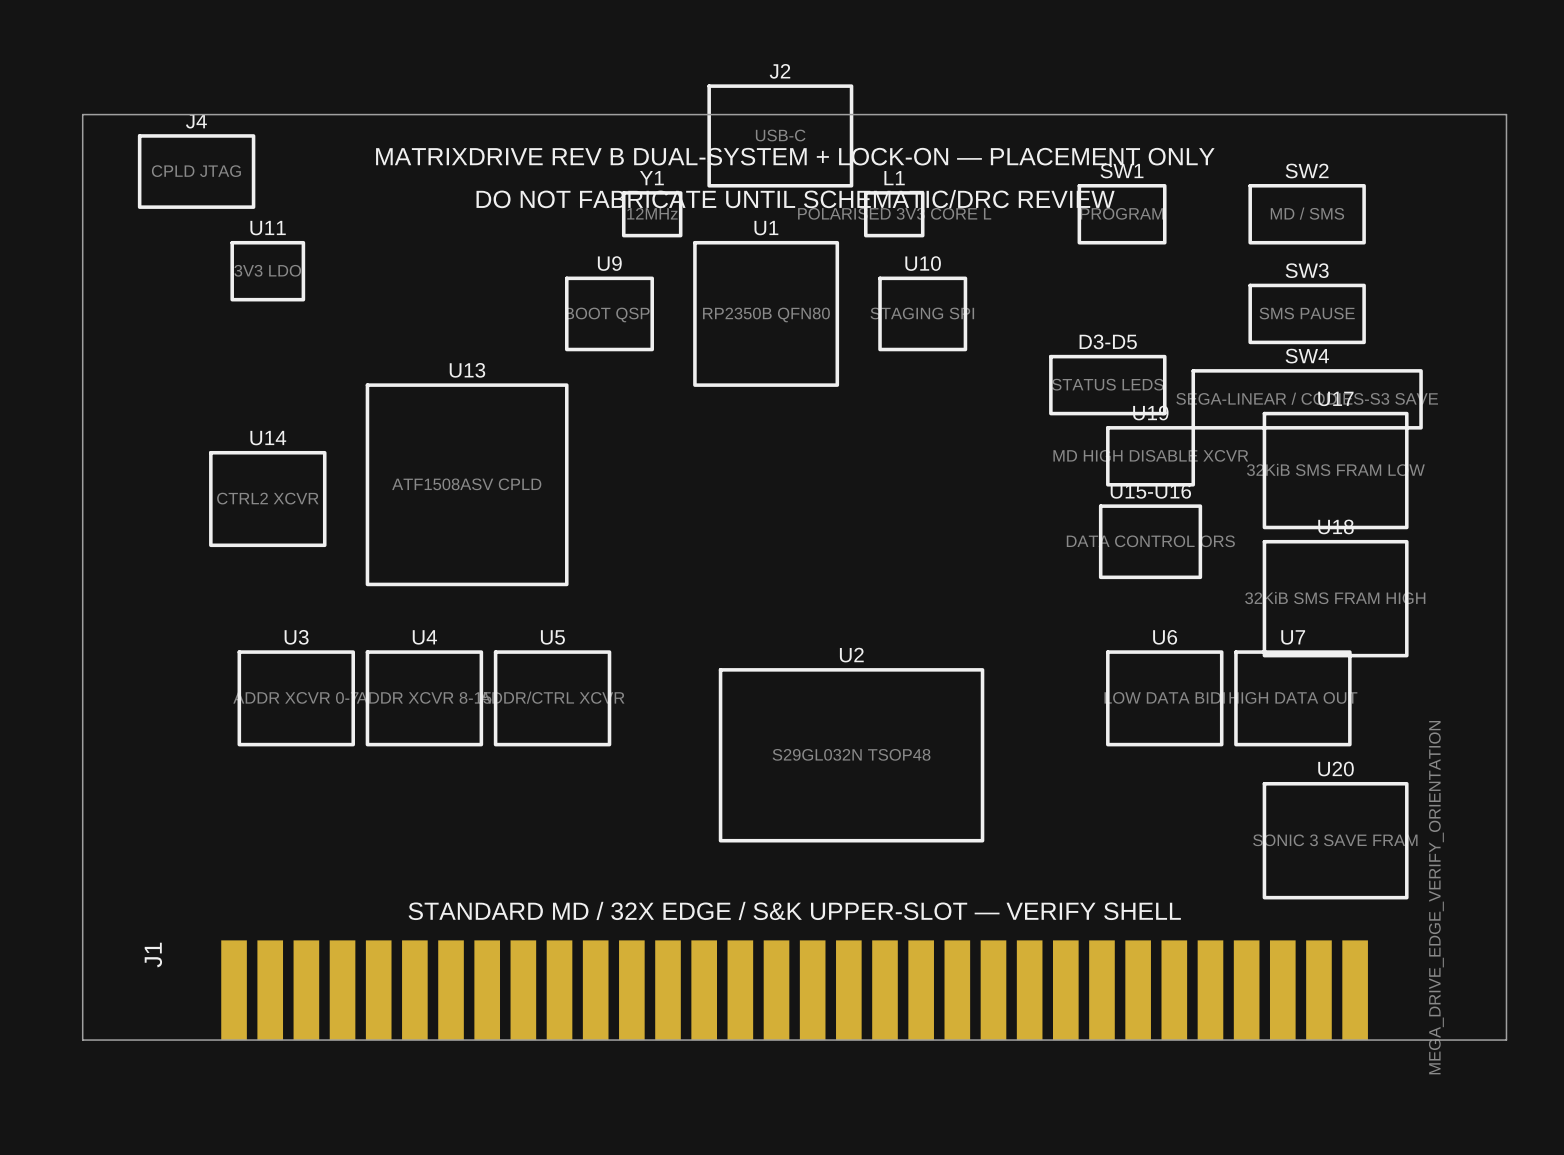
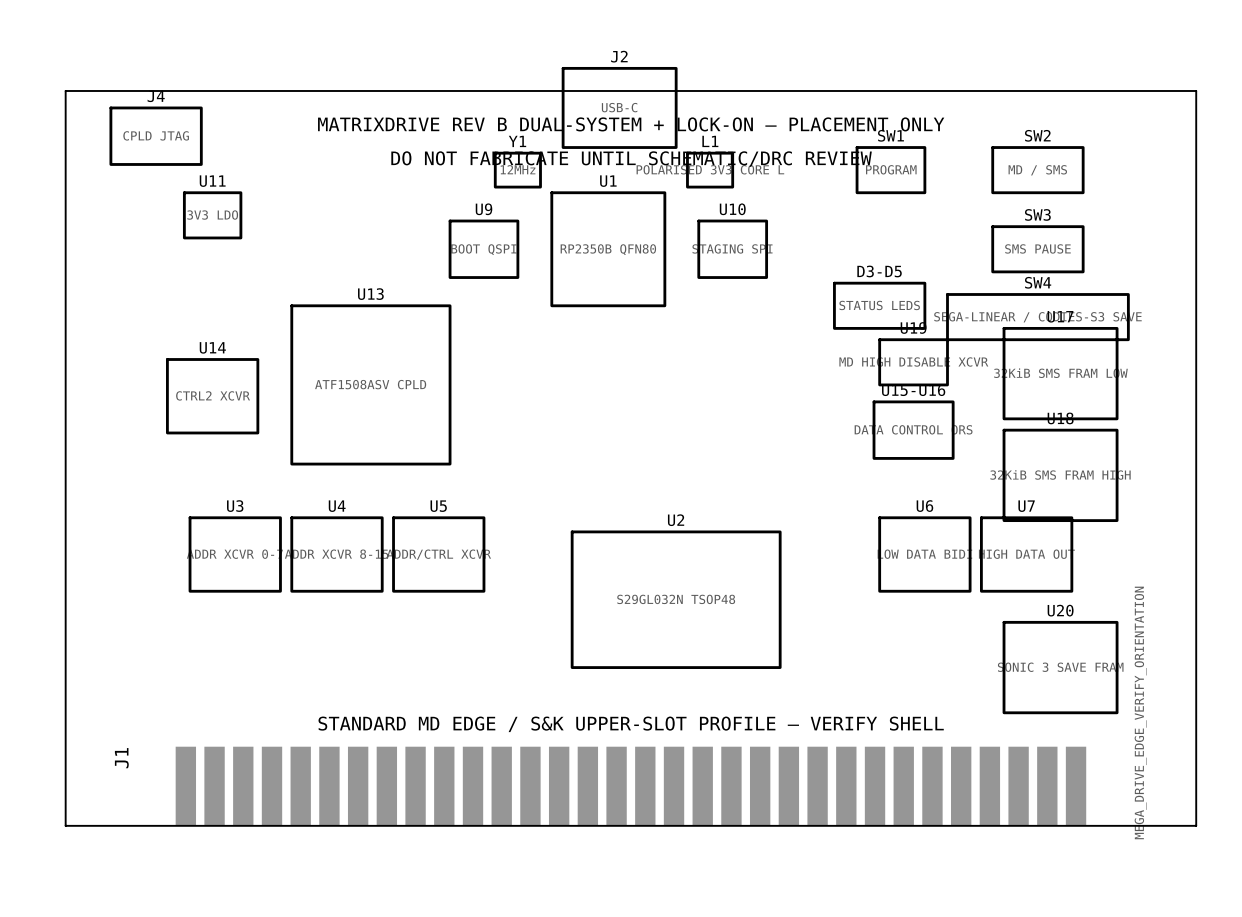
text: STANDARD MD / 32X EDGE / S&K UPPER-SLOT — VERIFY SHELL (794, 910) -> STANDARD MD EDGE / S&K UPPER-SLOT PROFILE — VERIFY SHELL (631, 724)

